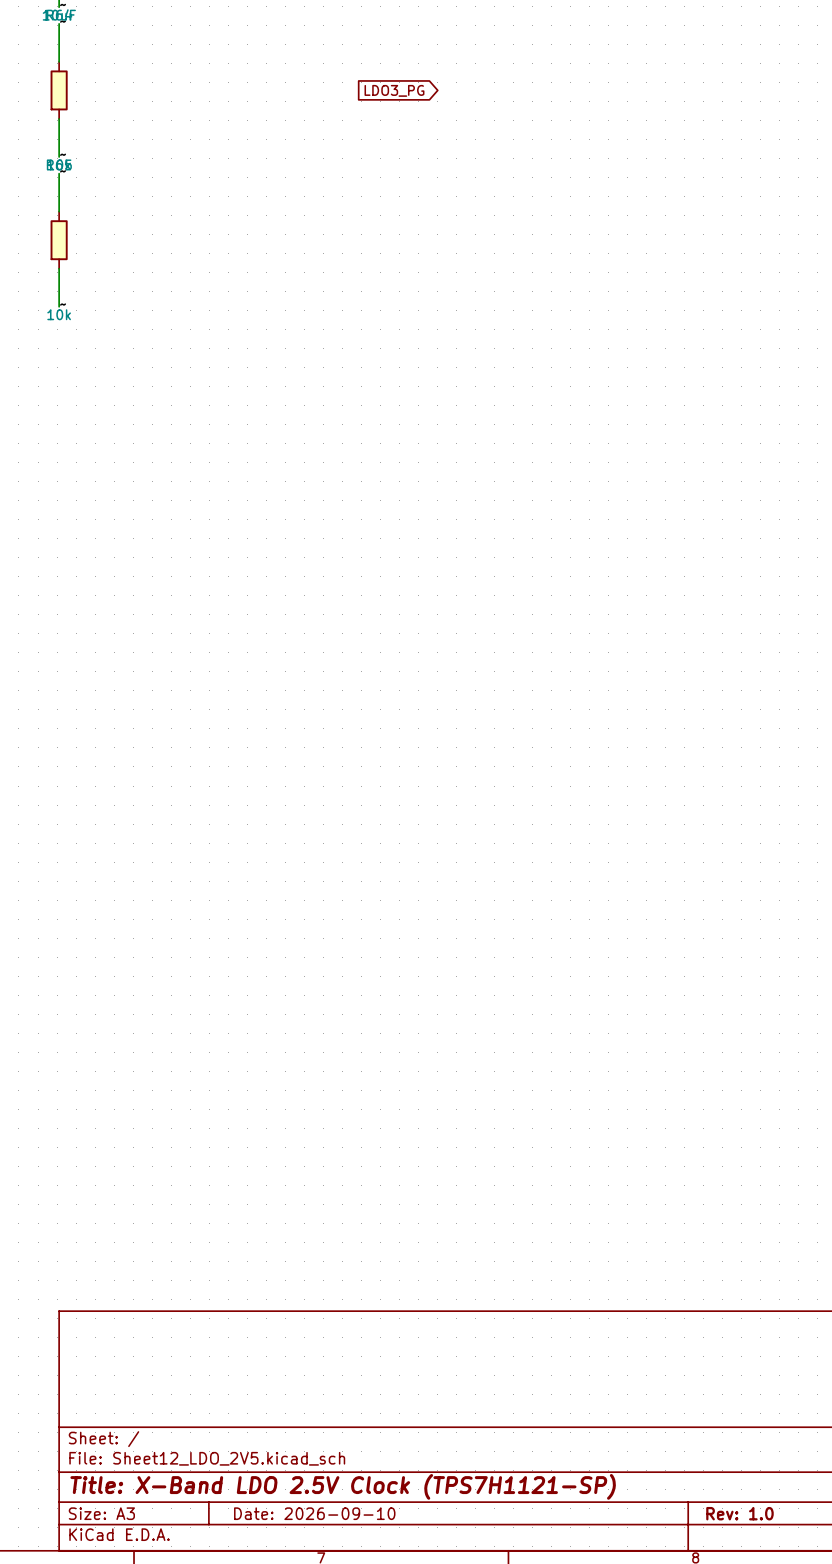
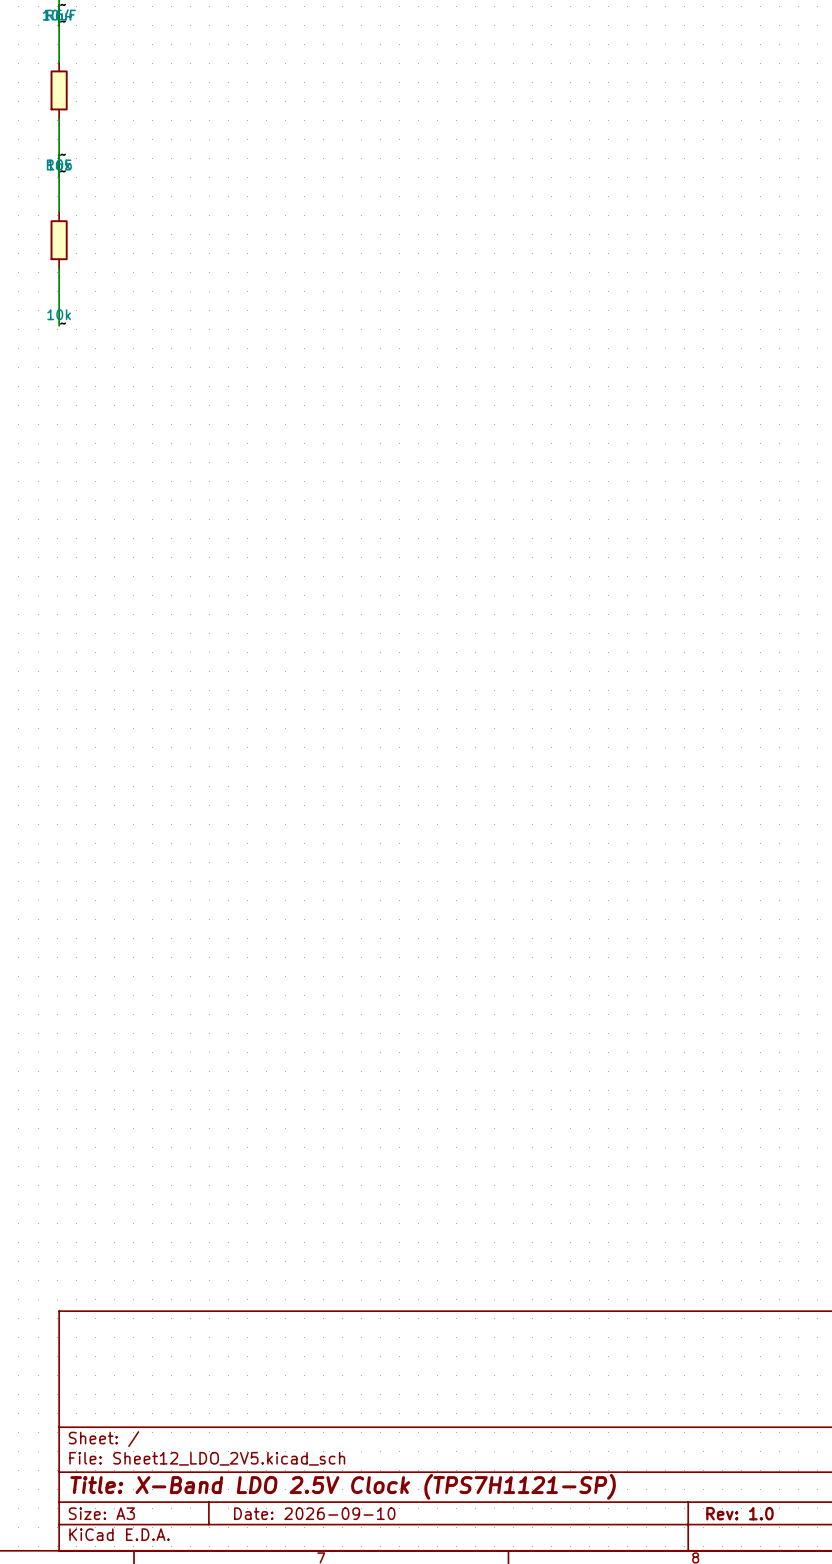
wire: none -> (59, 7) (59, 23)
global label: LDO3_PG (394, 90) -> none
wire: none -> (59, 157) (59, 173)
label position: ~ (63, 304) -> ~ (63, 323)
wire: none -> (59, 306) (59, 325)

